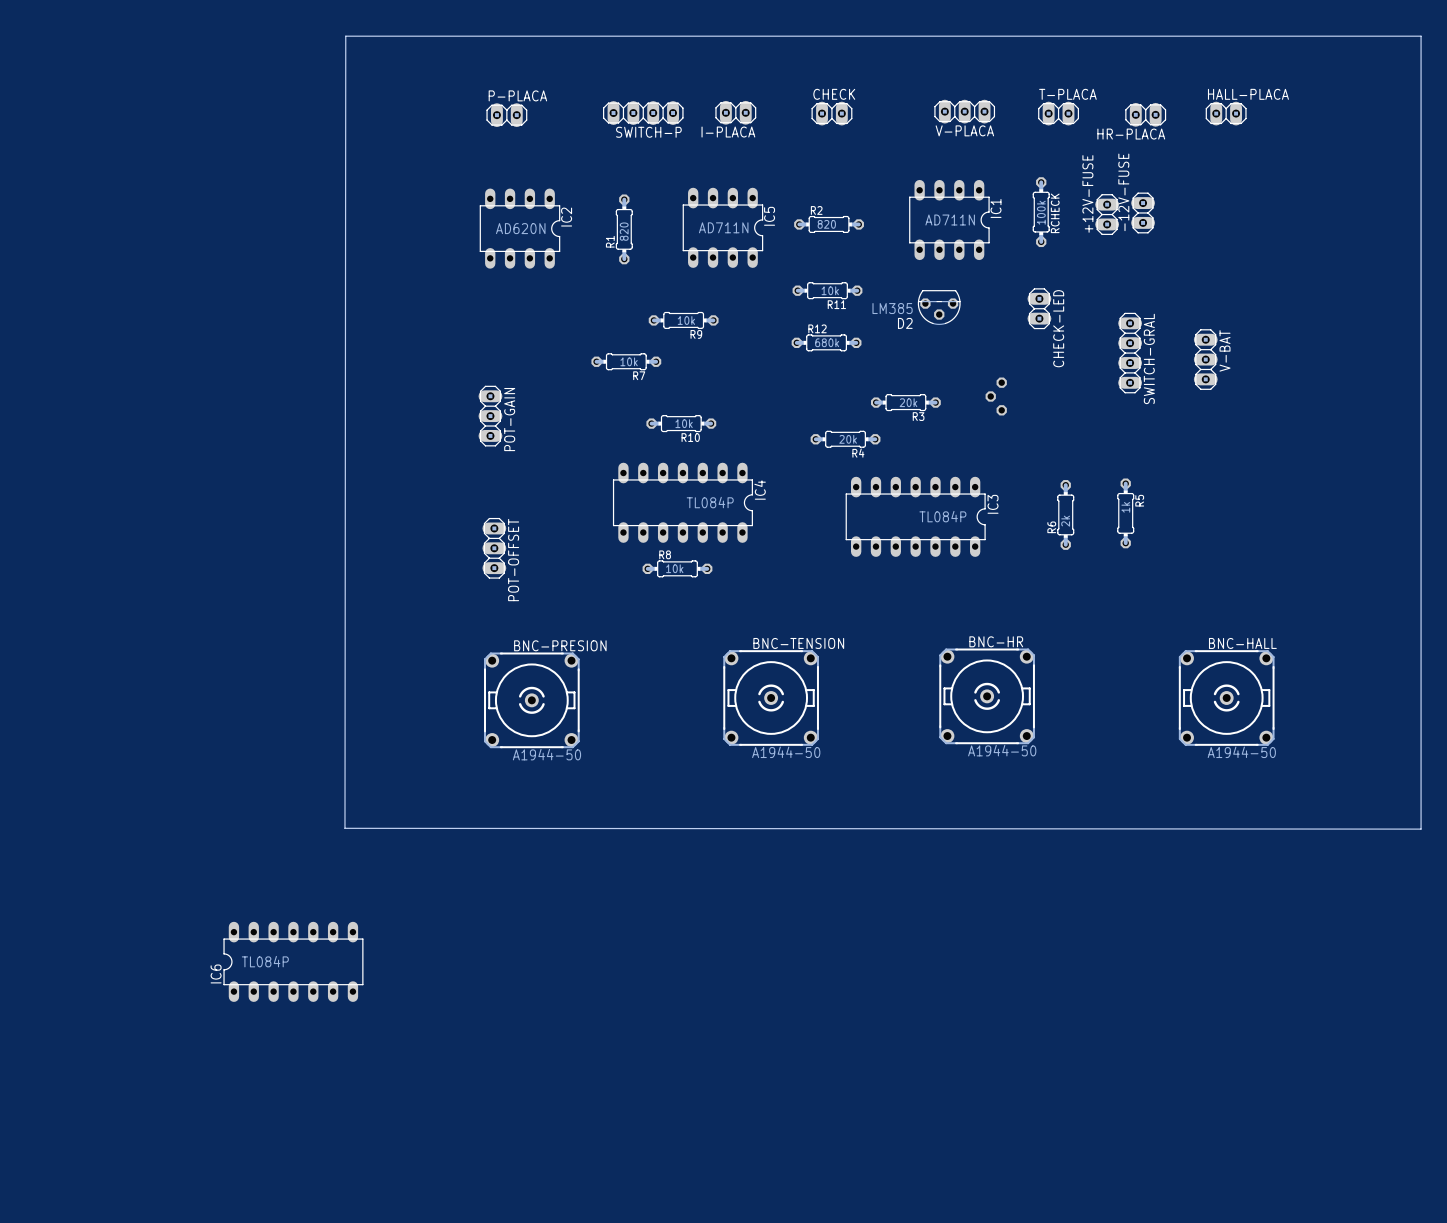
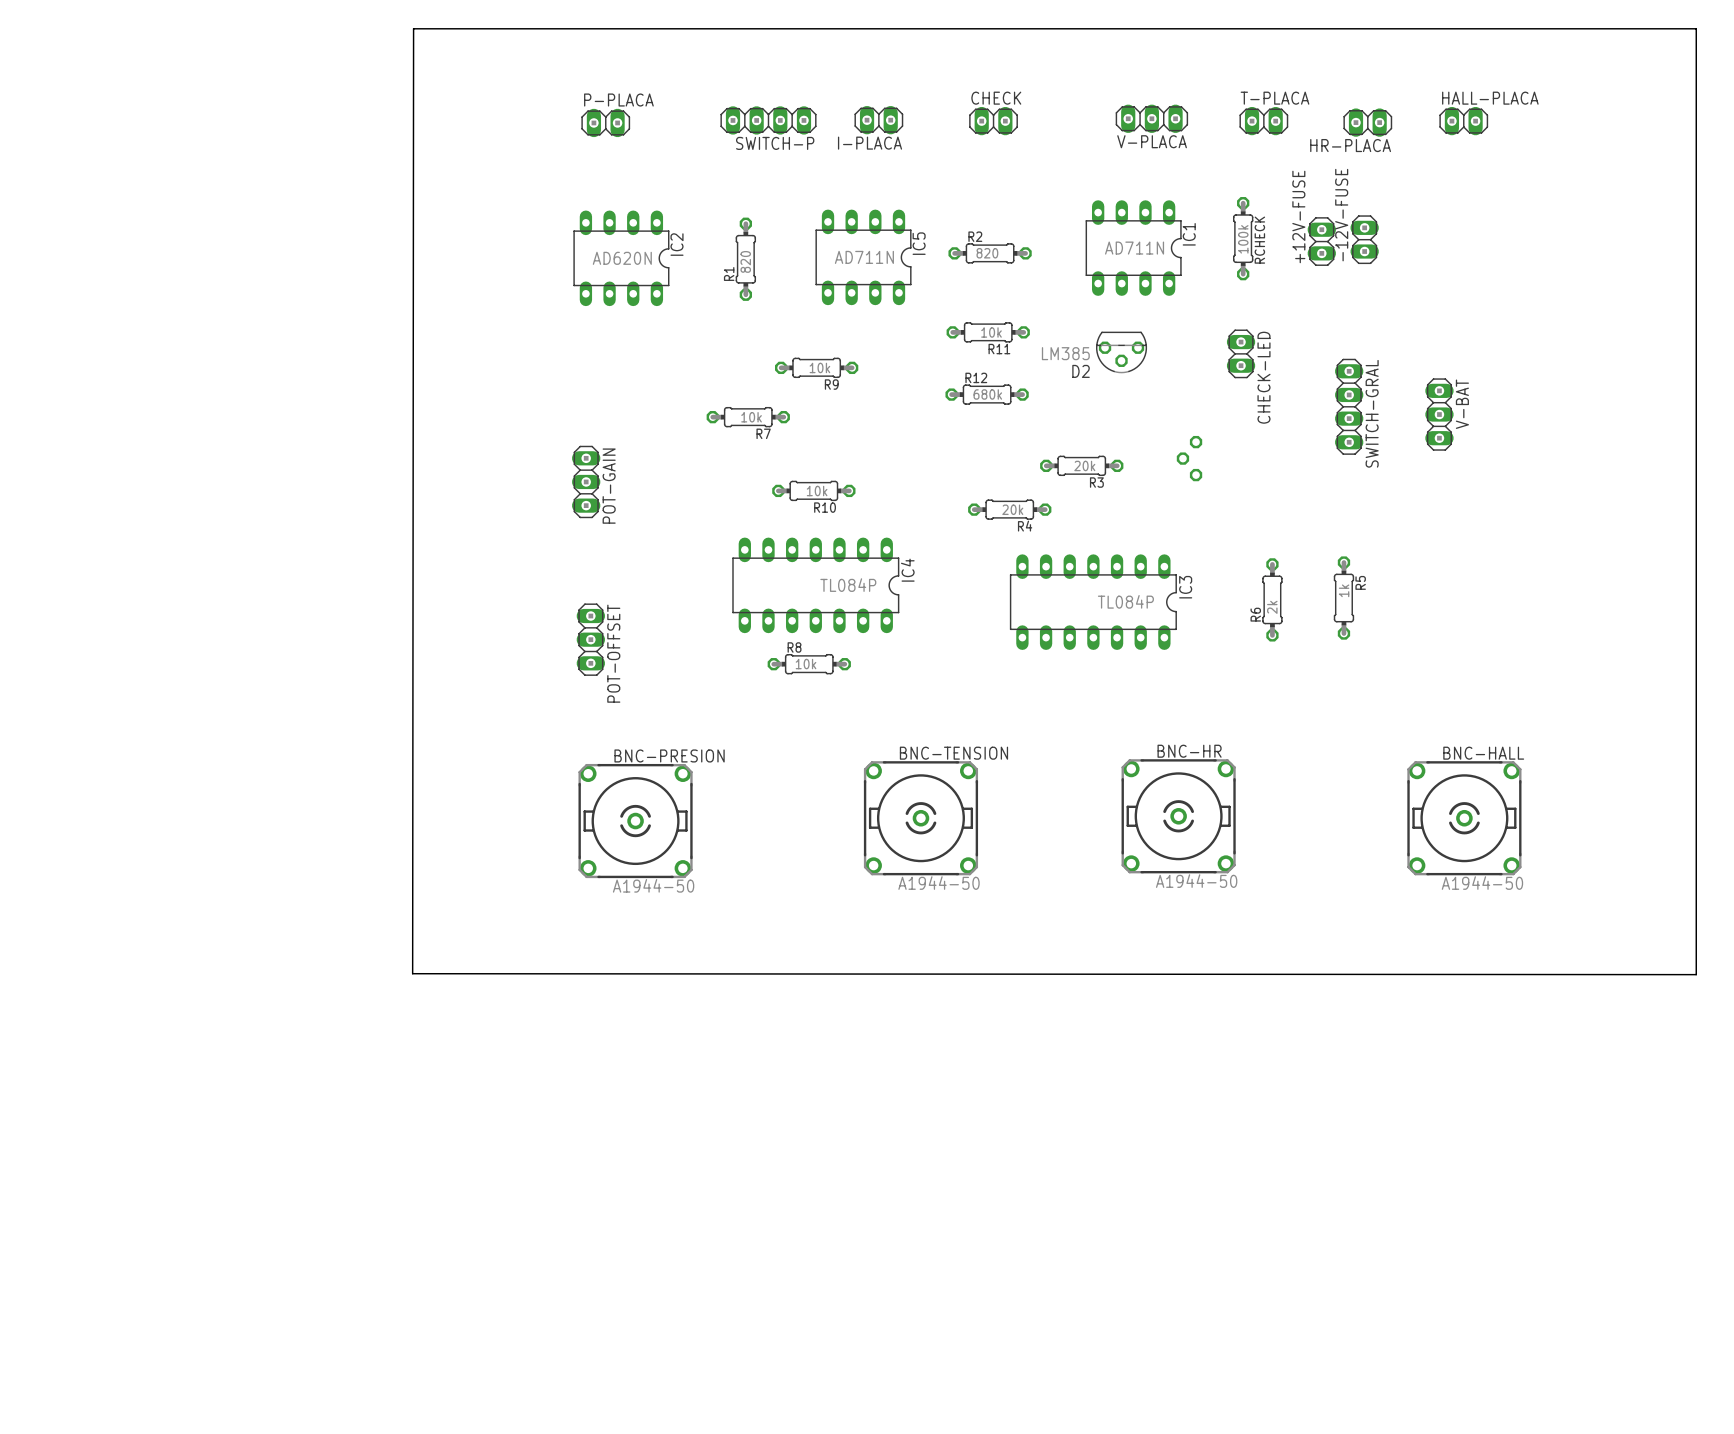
IC6: TL084P (293, 961) -> none

